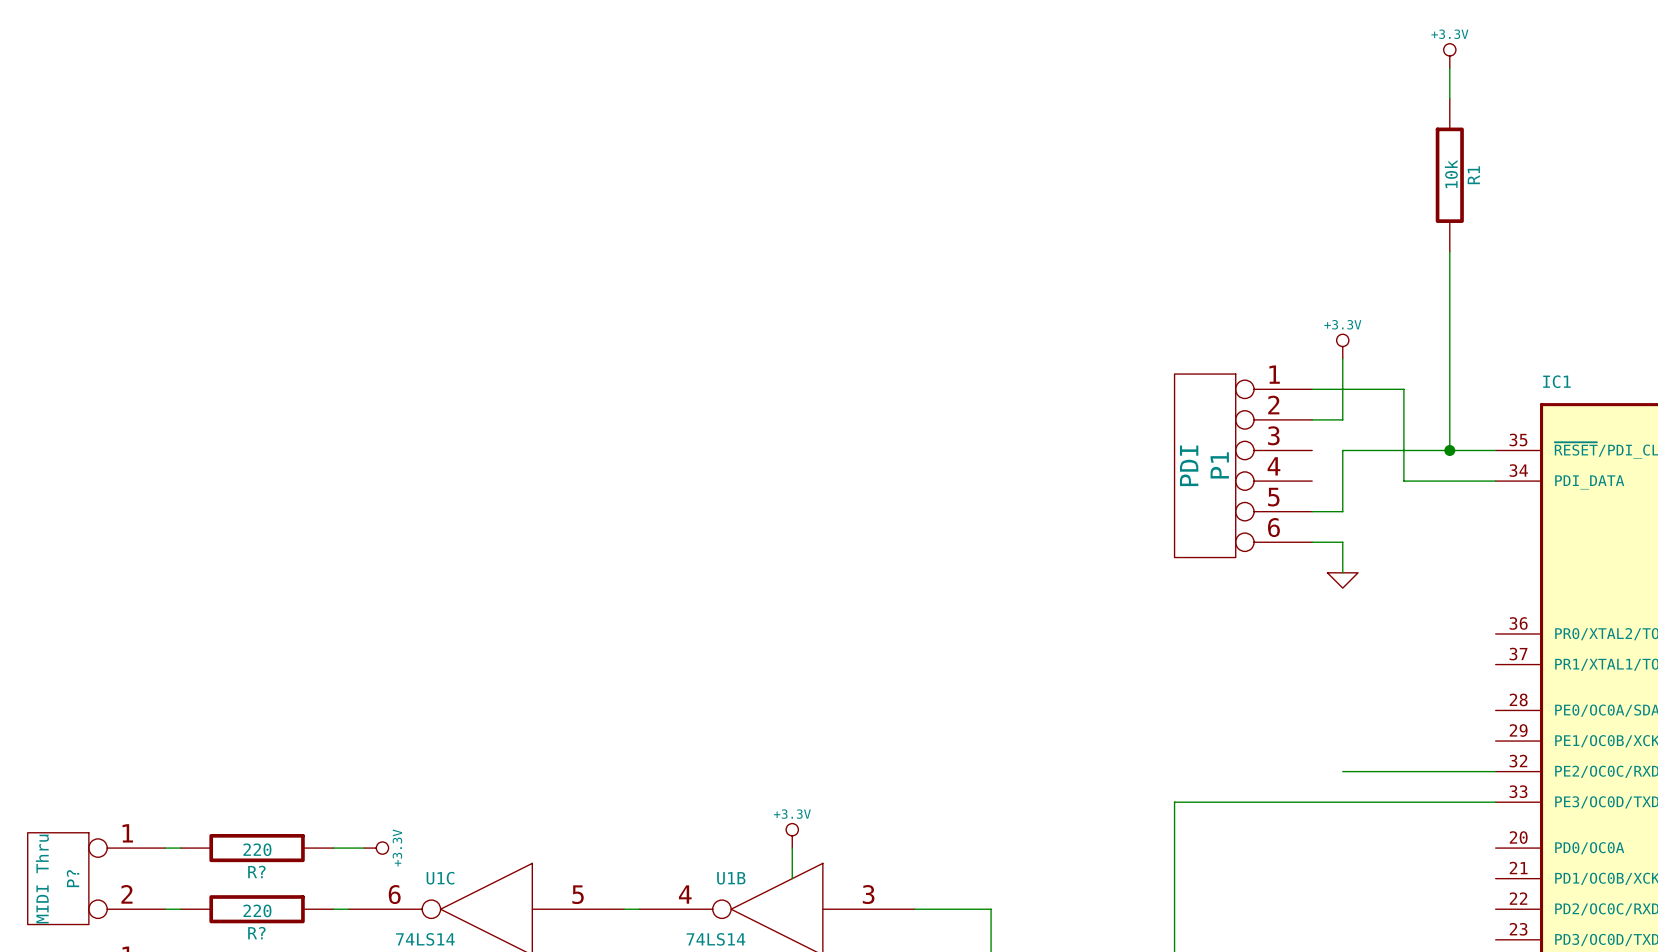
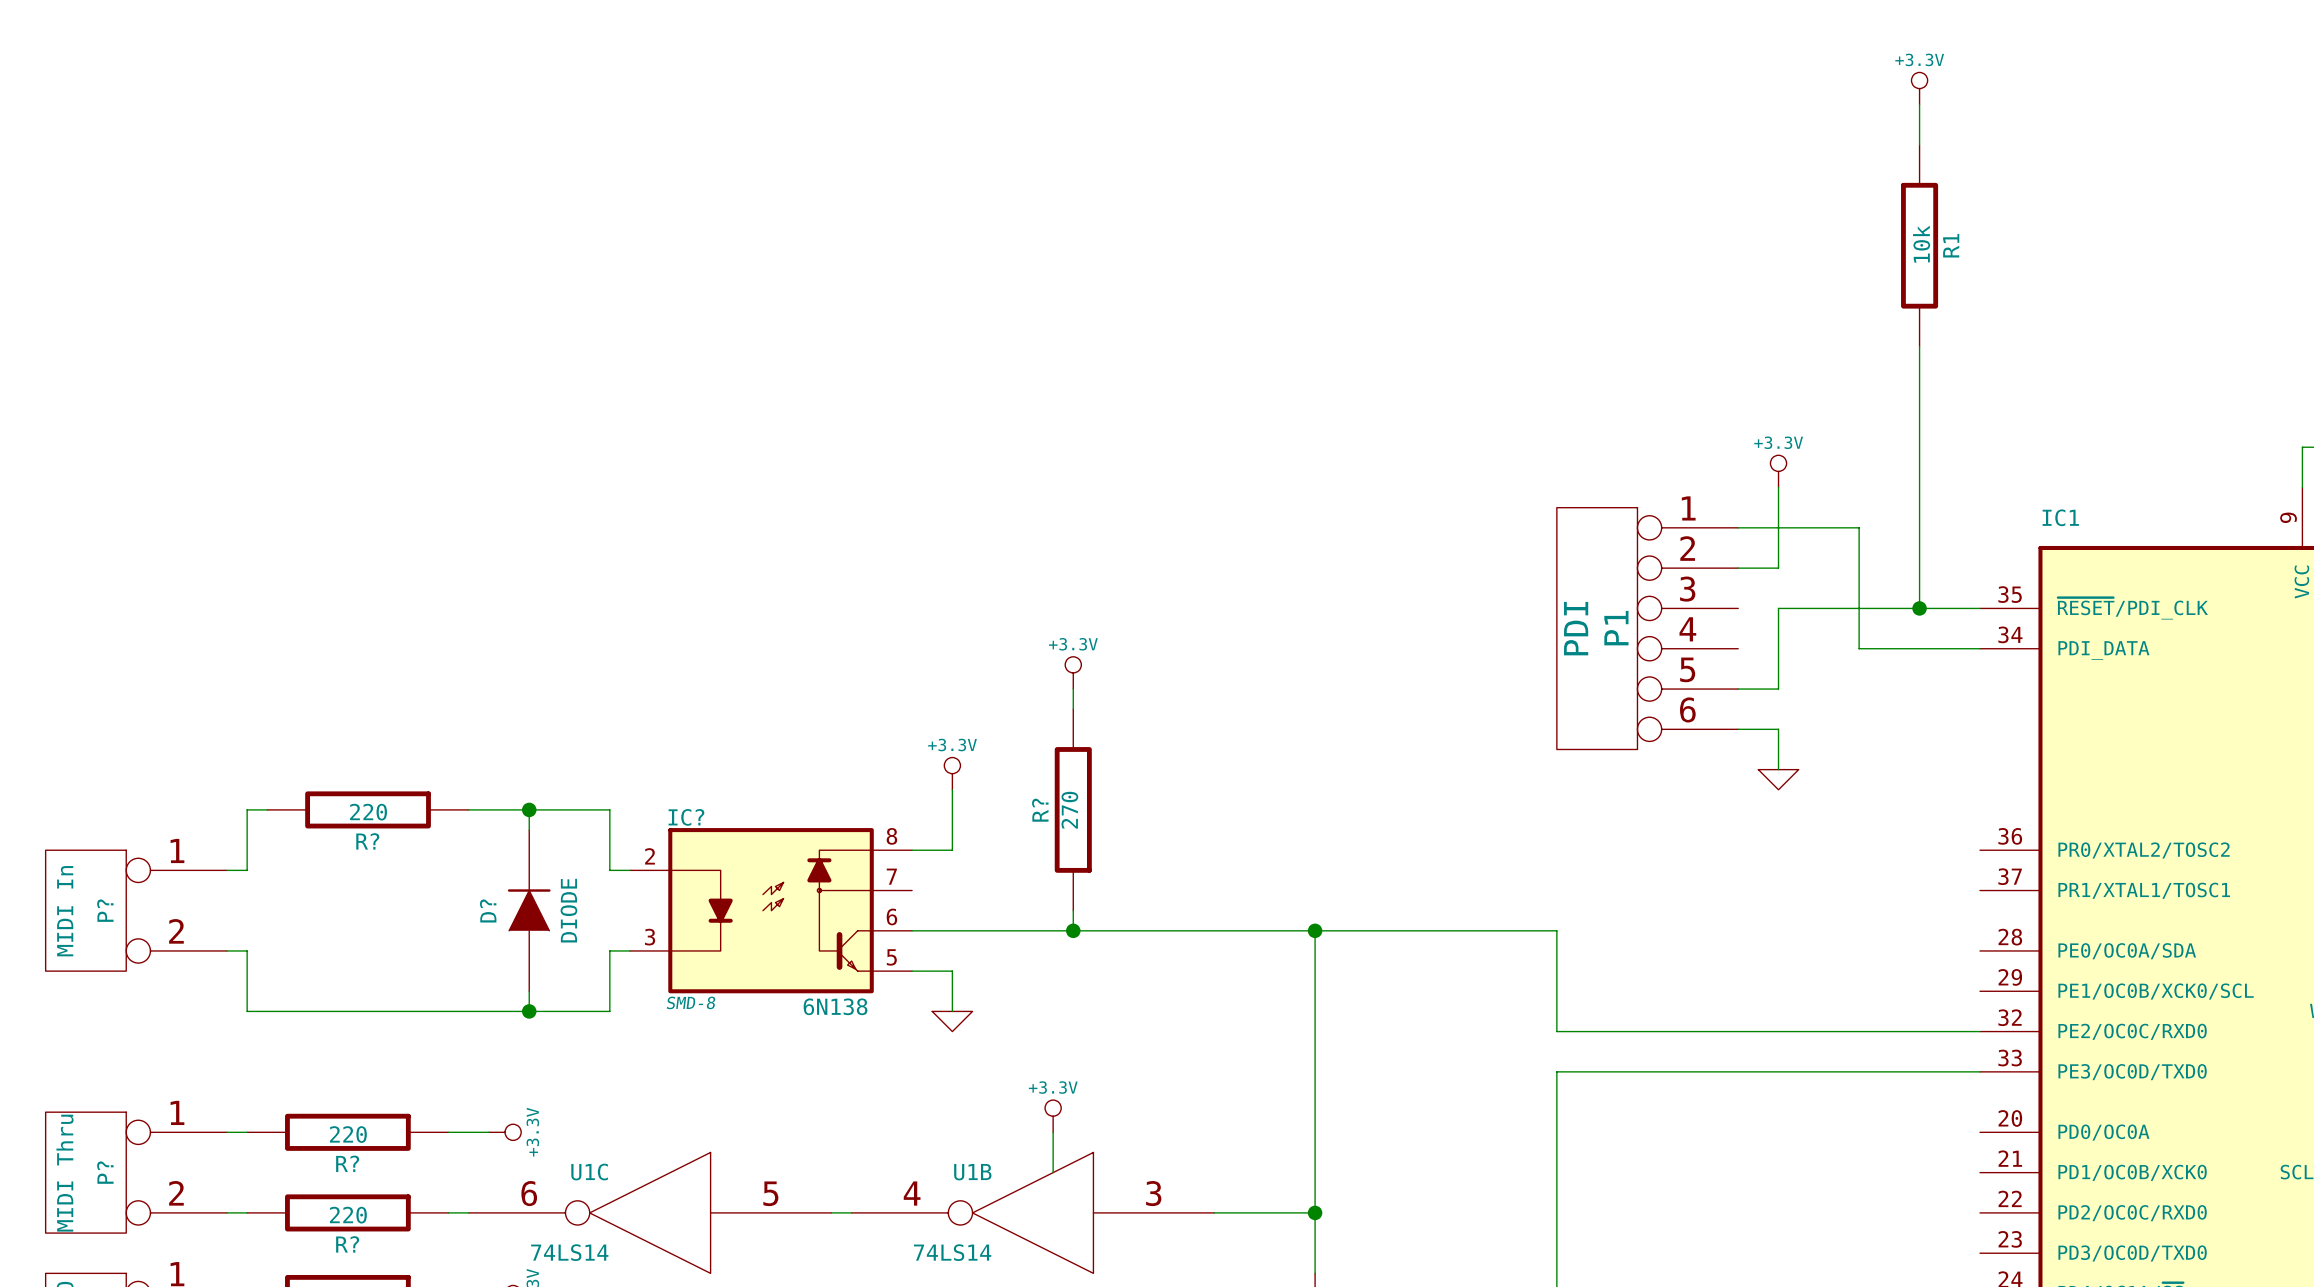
power symbol: none -> +3.3V (1073, 672)
wire: none -> (1073, 689) (1073, 709)
power symbol: none -> +3.3V (952, 773)
wire: none -> (952, 789) (952, 850) (912, 850)
wire: none -> (267, 809) (247, 809) (247, 870) (226, 870)
R?: none -> 220 (368, 809)
wire: none -> (468, 809) (609, 809) (609, 870) (629, 870)
wire: none -> (529, 809) (529, 830)
junction: none -> (529, 809)
R?: none -> 270 (1073, 809)
P?: none -> MIDI In (136, 910)
D?: none -> DIODE (529, 910)
IC?: none -> 6N138 (771, 910)
wire: none -> (1073, 910) (1073, 930)
wire: none -> (912, 930) (1556, 930) (1556, 1031) (1778, 1031)
junction: none -> (1073, 930)
wire: none -> (1315, 930) (1315, 1212)
junction: none -> (1315, 930)
wire: none -> (226, 950) (247, 950) (247, 1011) (609, 1011) (609, 950) (629, 950)
wire: none -> (912, 971) (952, 971) (952, 1011)
wire: none -> (529, 991) (529, 1011)
junction: none -> (529, 1011)
power symbol: none -> (952, 1021)
junction: none -> (1315, 1212)

